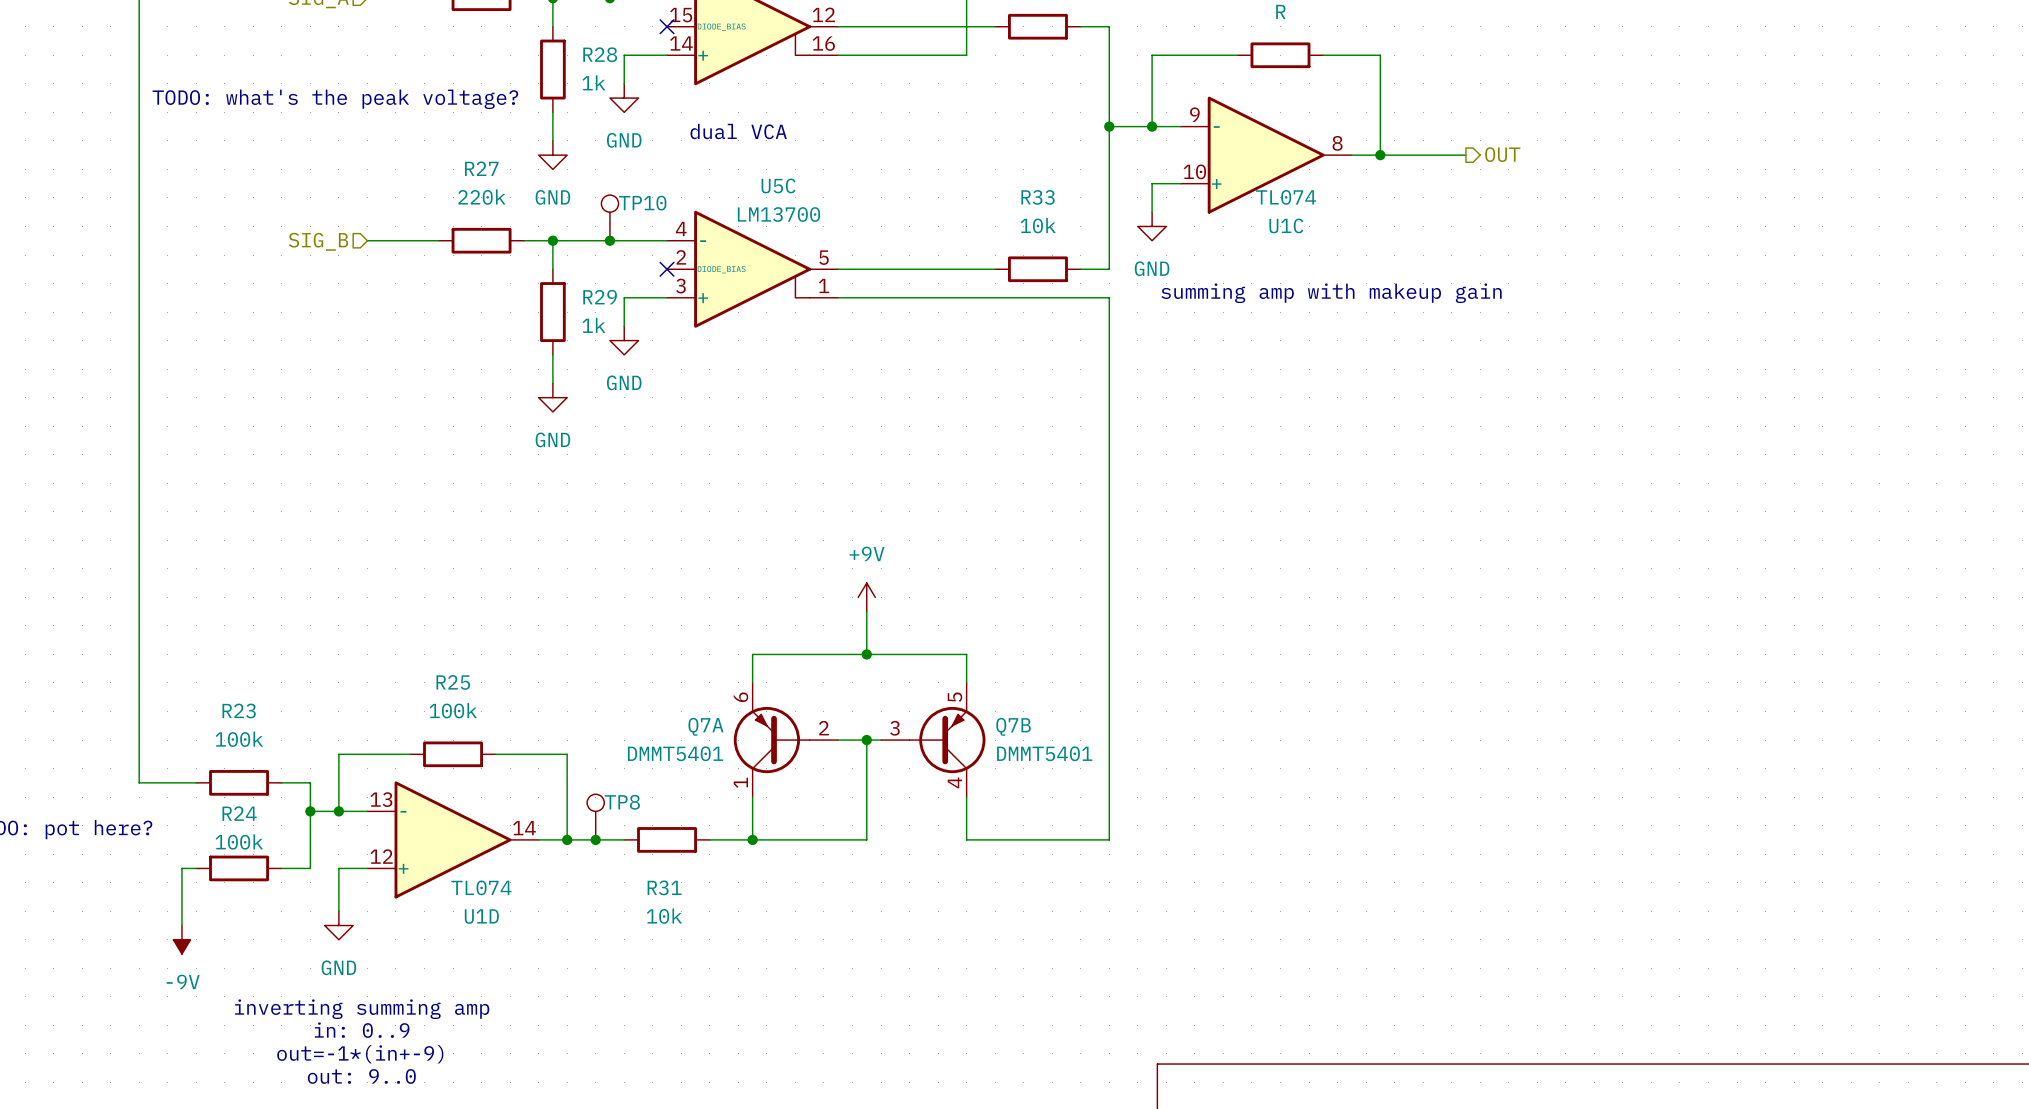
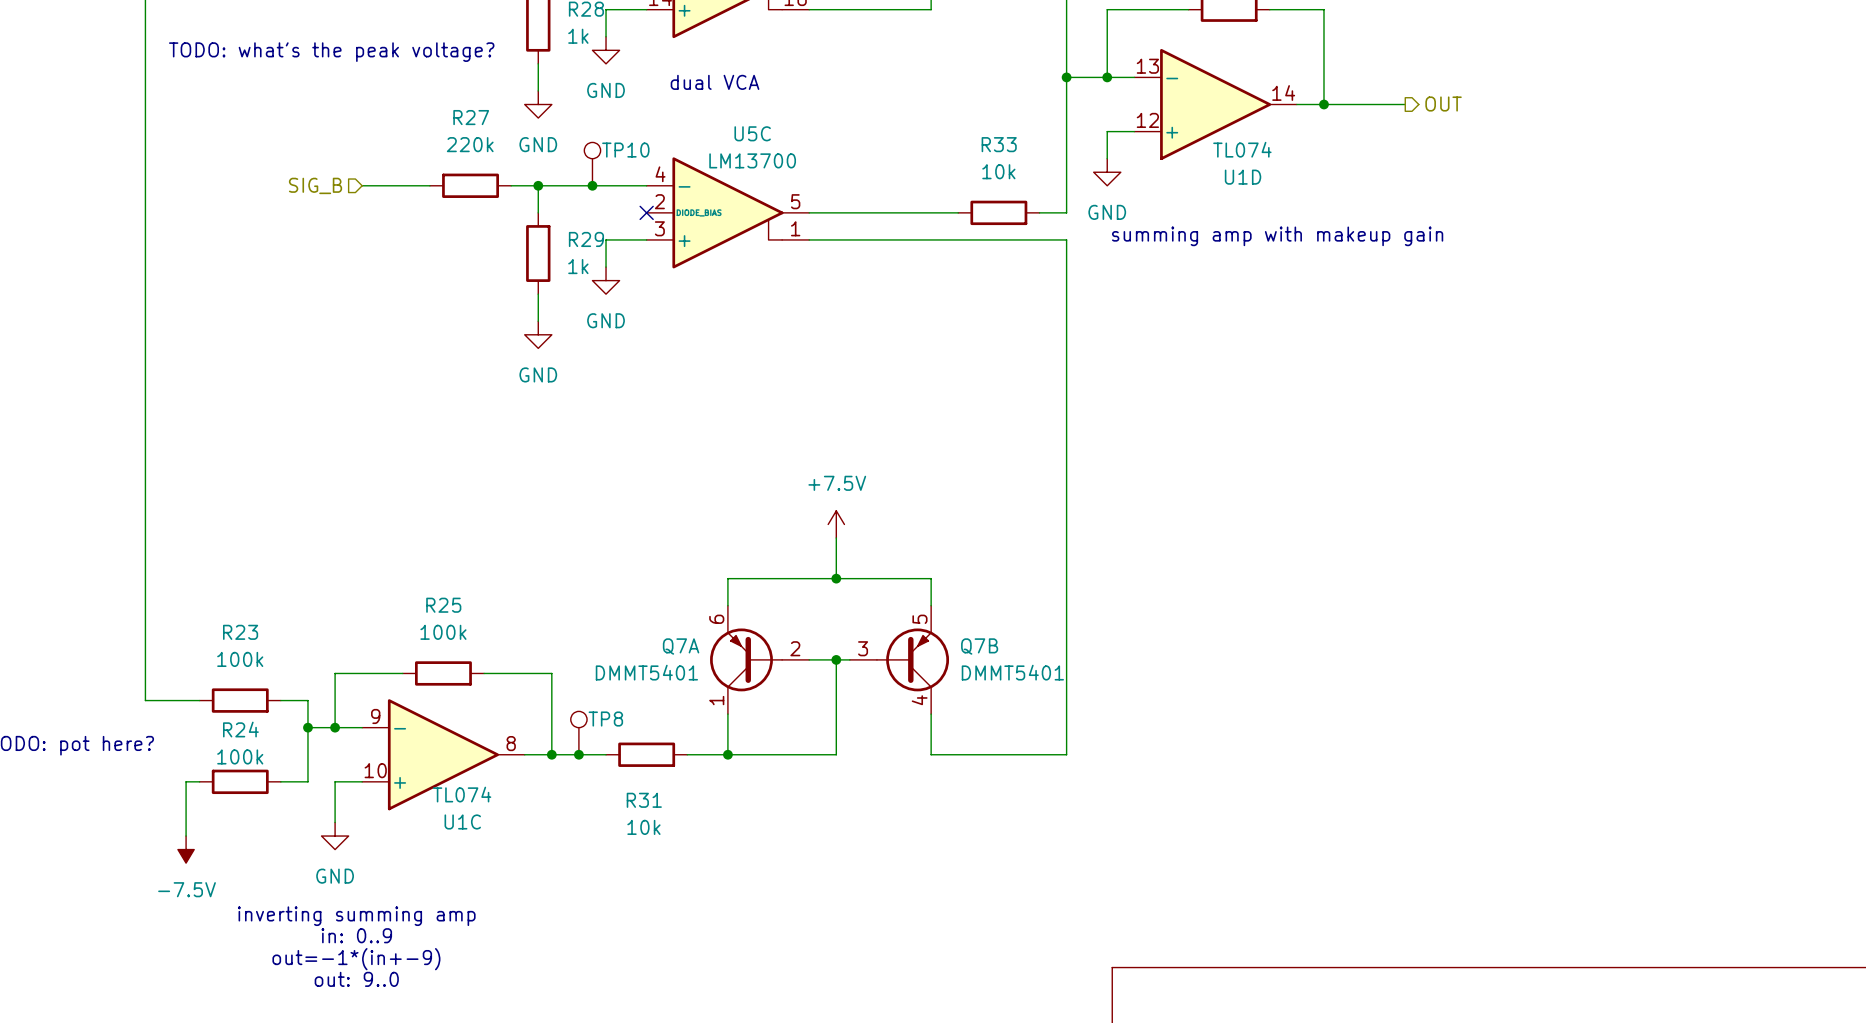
U1C position: (1266, 155) -> (443, 754)
power symbol: +9V (866, 597) -> +7.5V (836, 524)
U1D position: (453, 839) -> (1215, 104)
power symbol: -9V (181, 939) -> -7.5V (186, 849)

